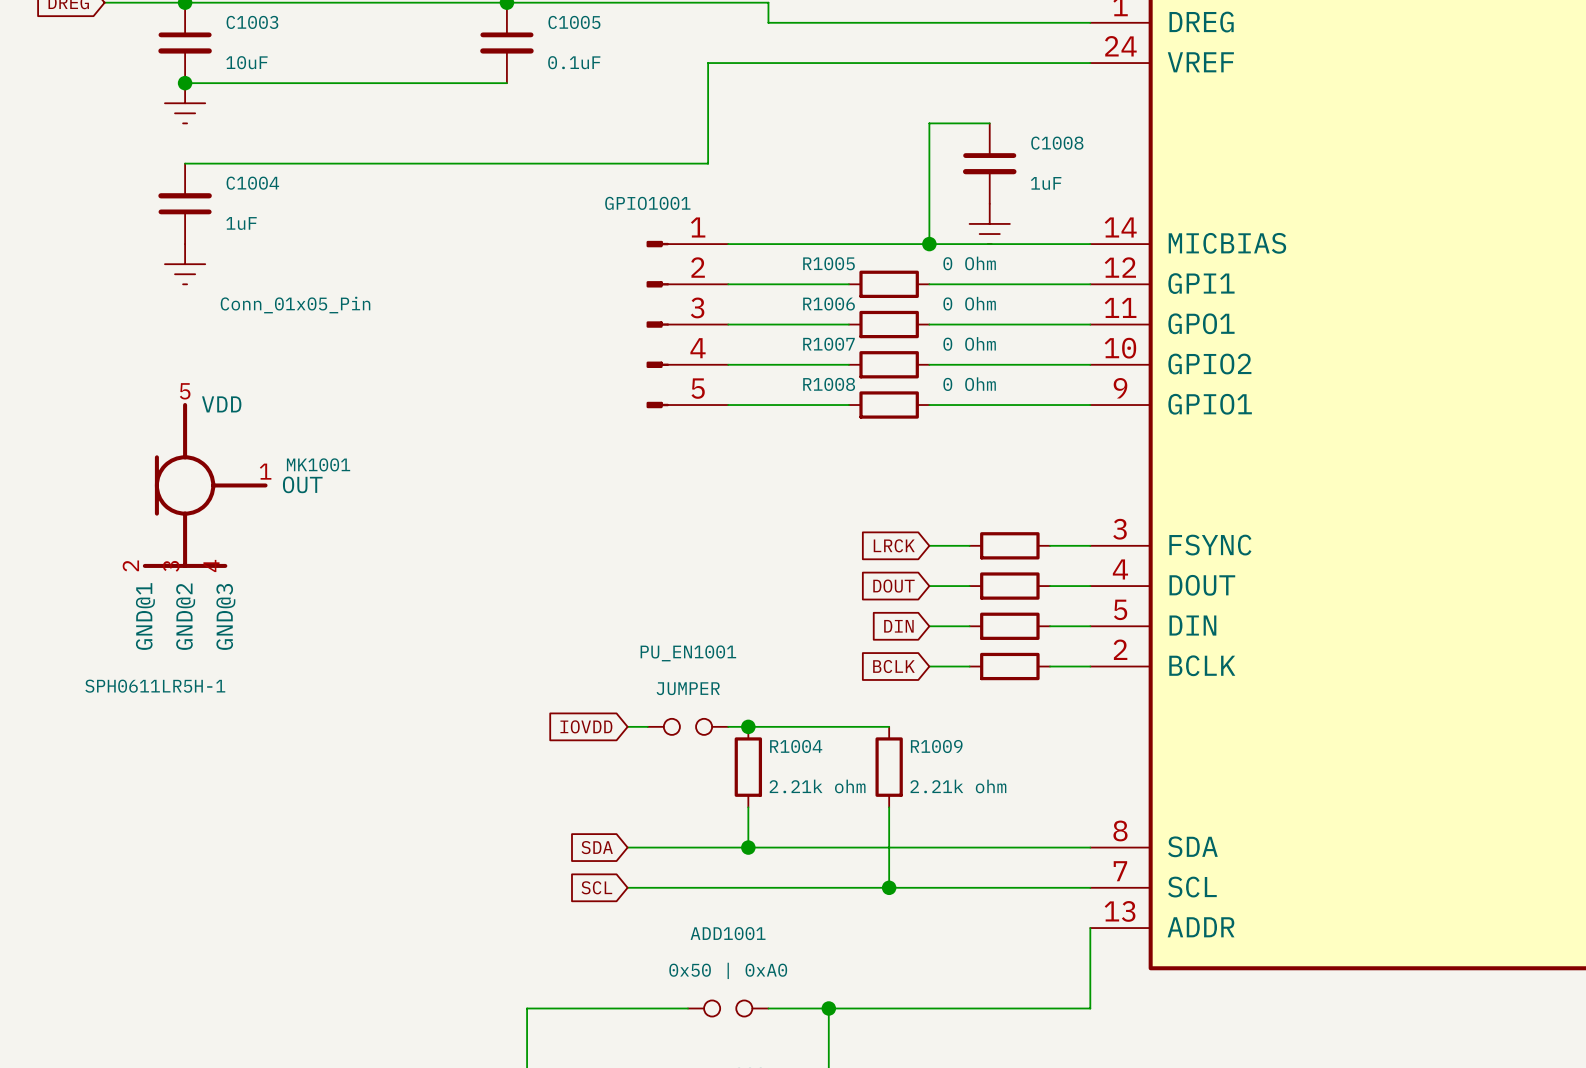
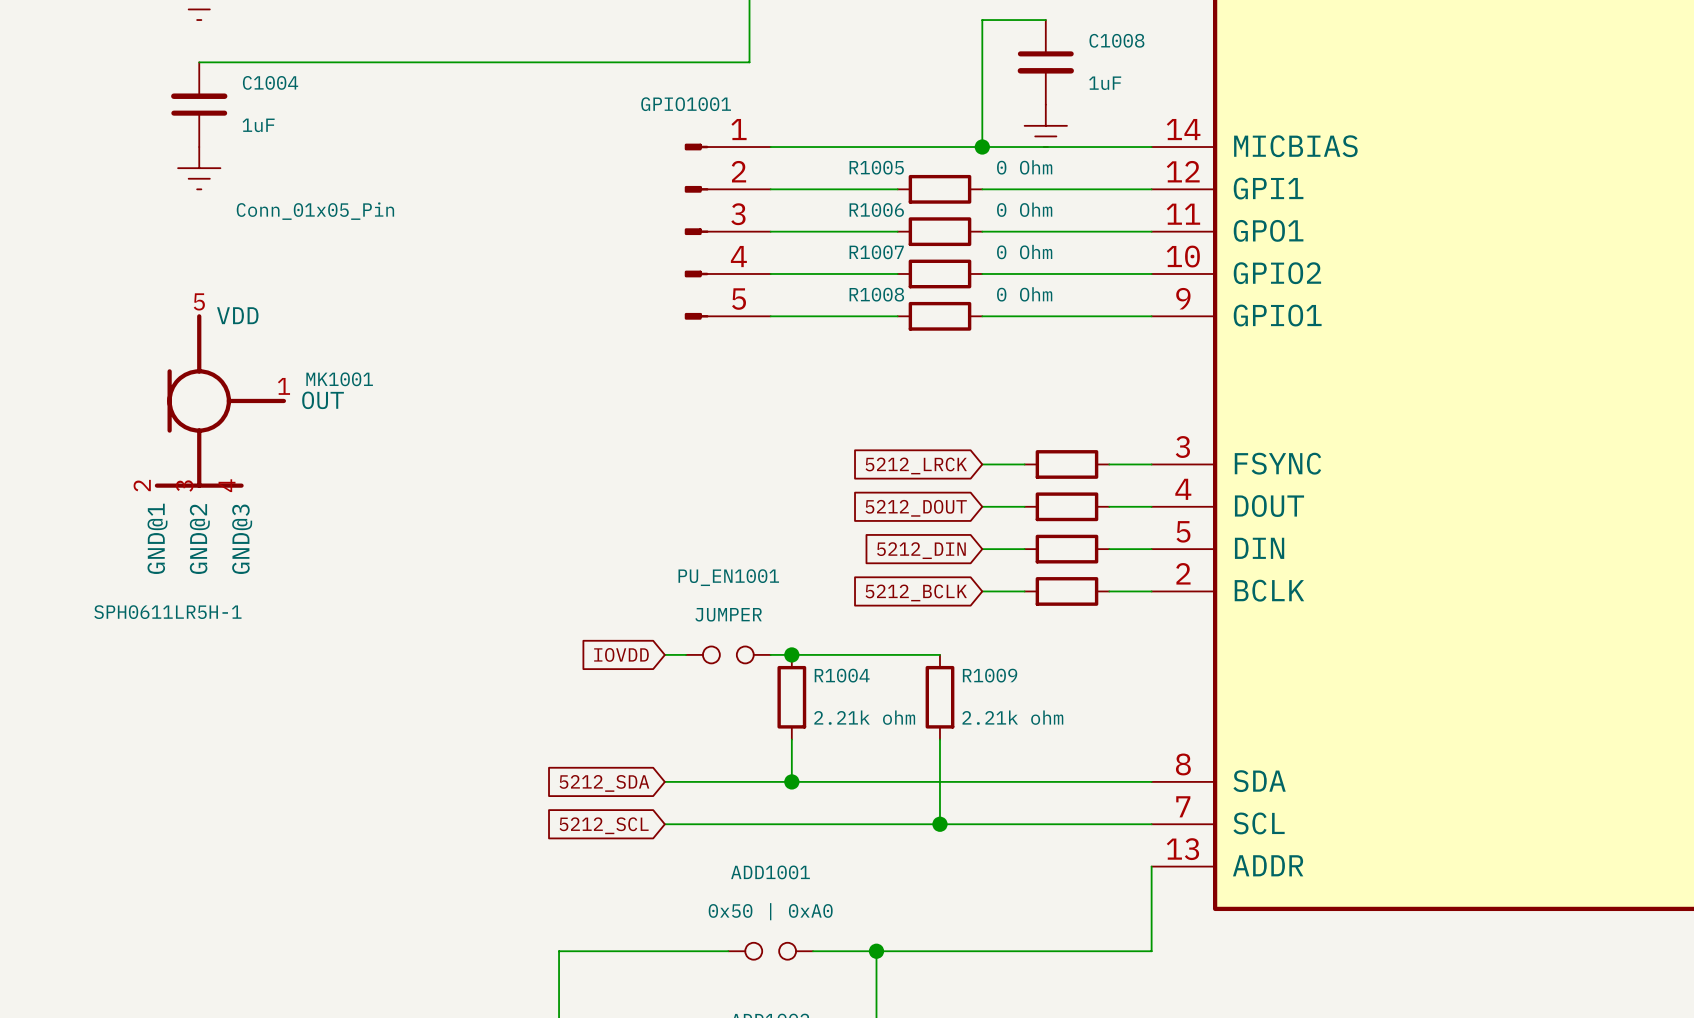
global label: LRCK (894, 545) -> 5212_LRCK (916, 465)
global label: DOUT (893, 586) -> 5212_DOUT (916, 508)
global label: DIN (898, 626) -> 5212_DIN (921, 550)
global label: BCLK (893, 666) -> 5212_BCLK (916, 592)
global label: SDA (597, 847) -> 5212_SDA (604, 783)
global label: SCL (596, 887) -> 5212_SCL (604, 825)

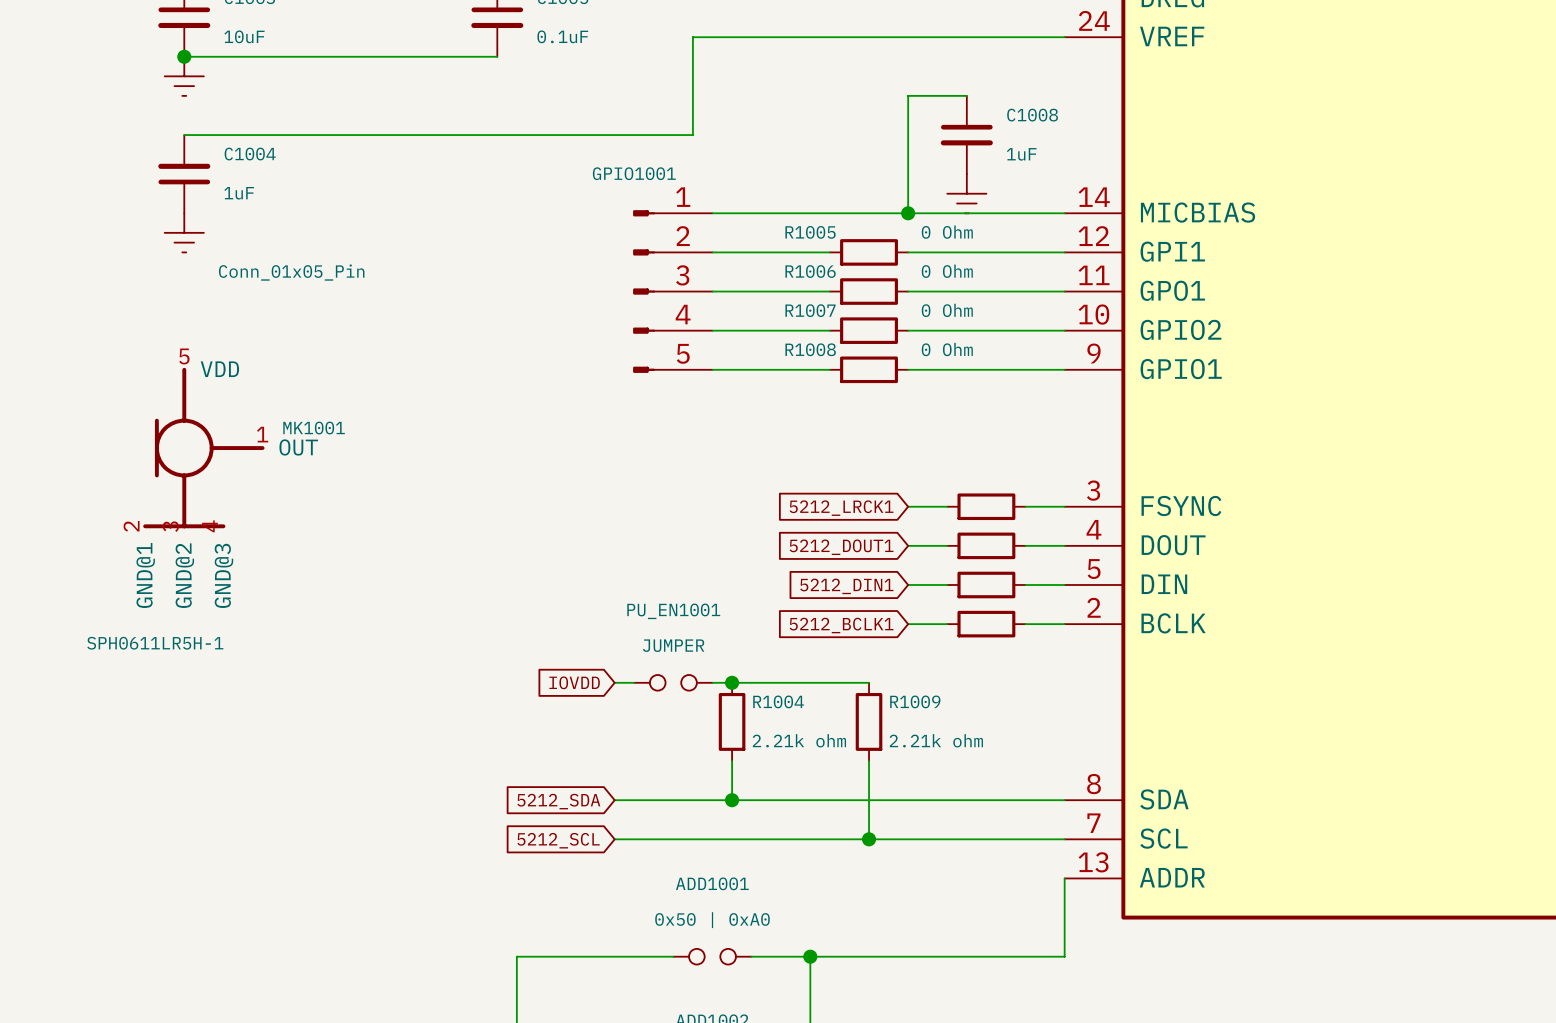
global label: 5212_LRCK (916, 465) -> 5212_LRCK1 (841, 508)
global label: 5212_DOUT (916, 508) -> 5212_DOUT1 (841, 547)
global label: 5212_DIN (921, 550) -> 5212_DIN1 (846, 586)
global label: 5212_BCLK (916, 592) -> 5212_BCLK1 (841, 625)

